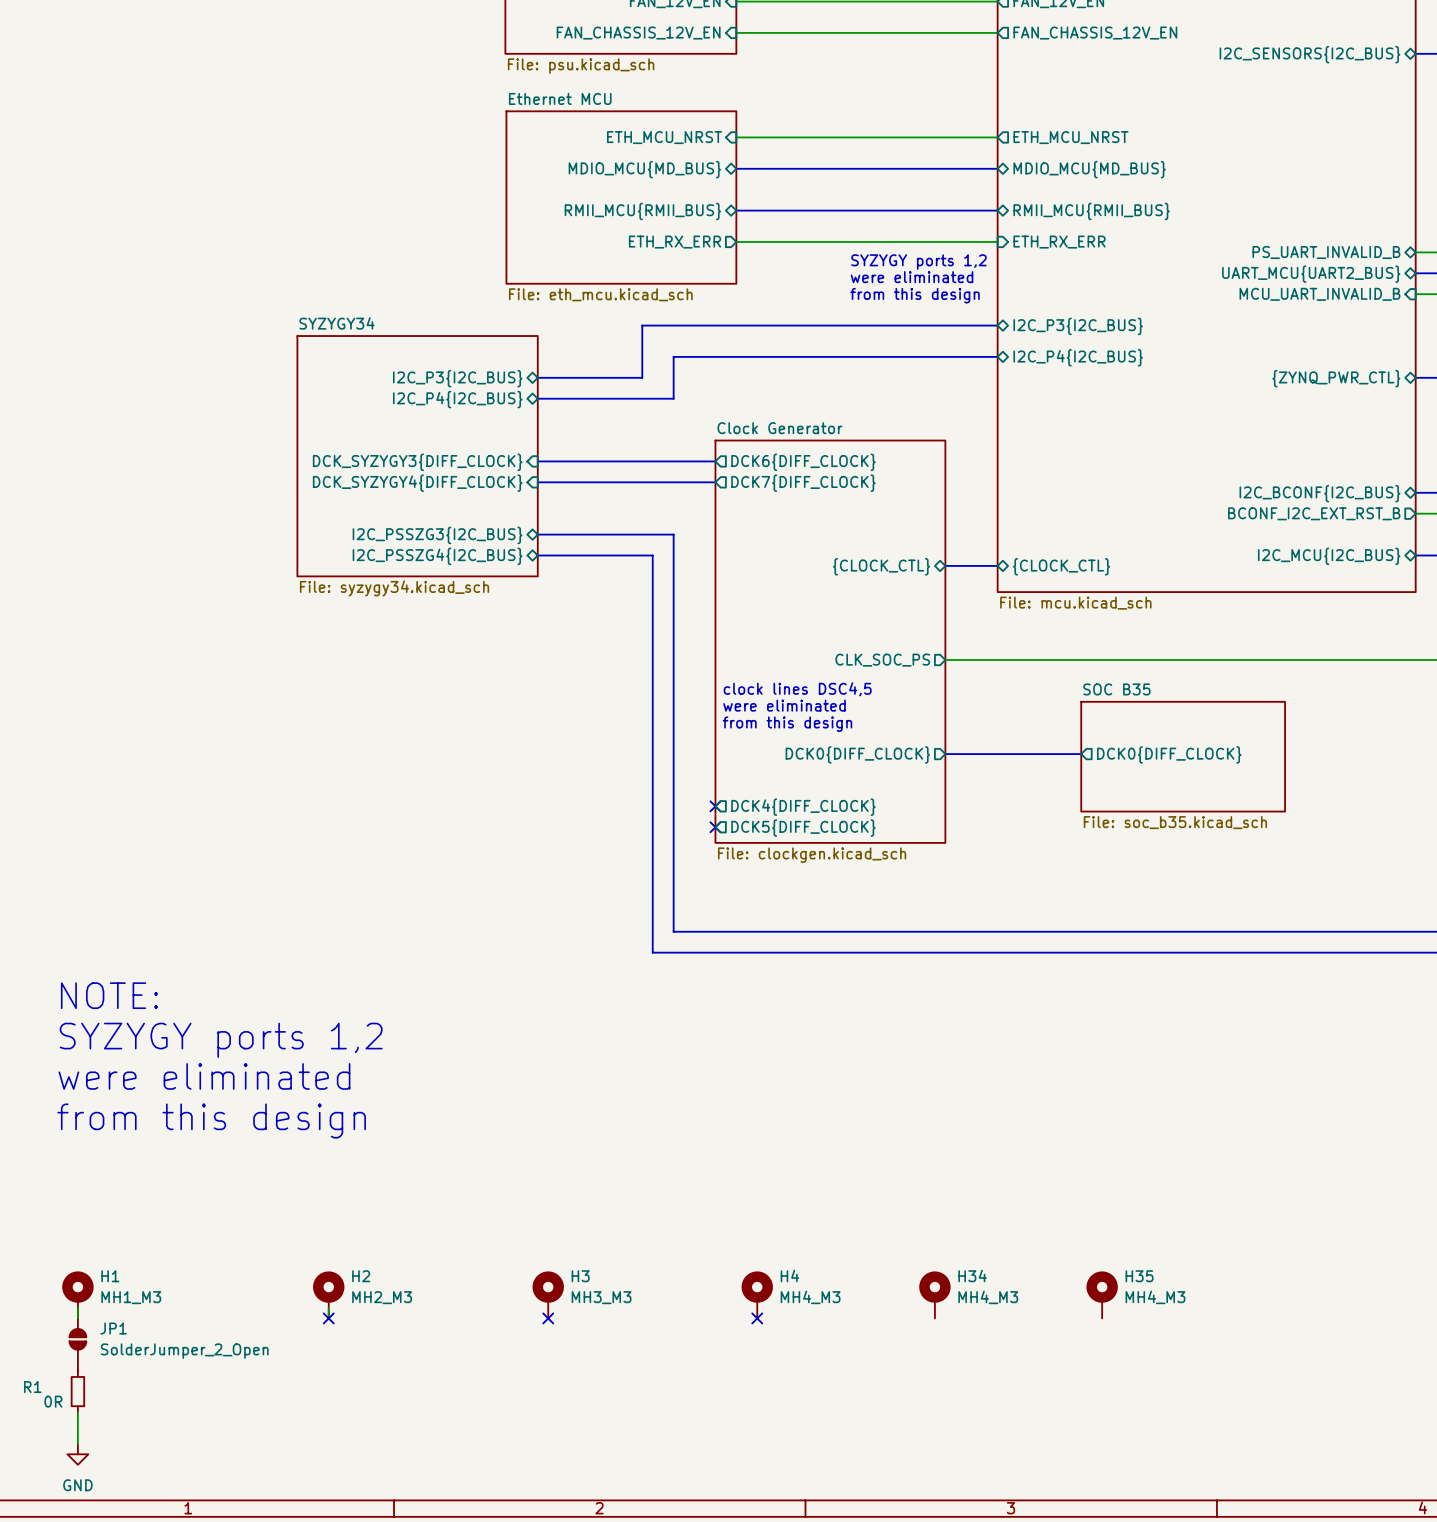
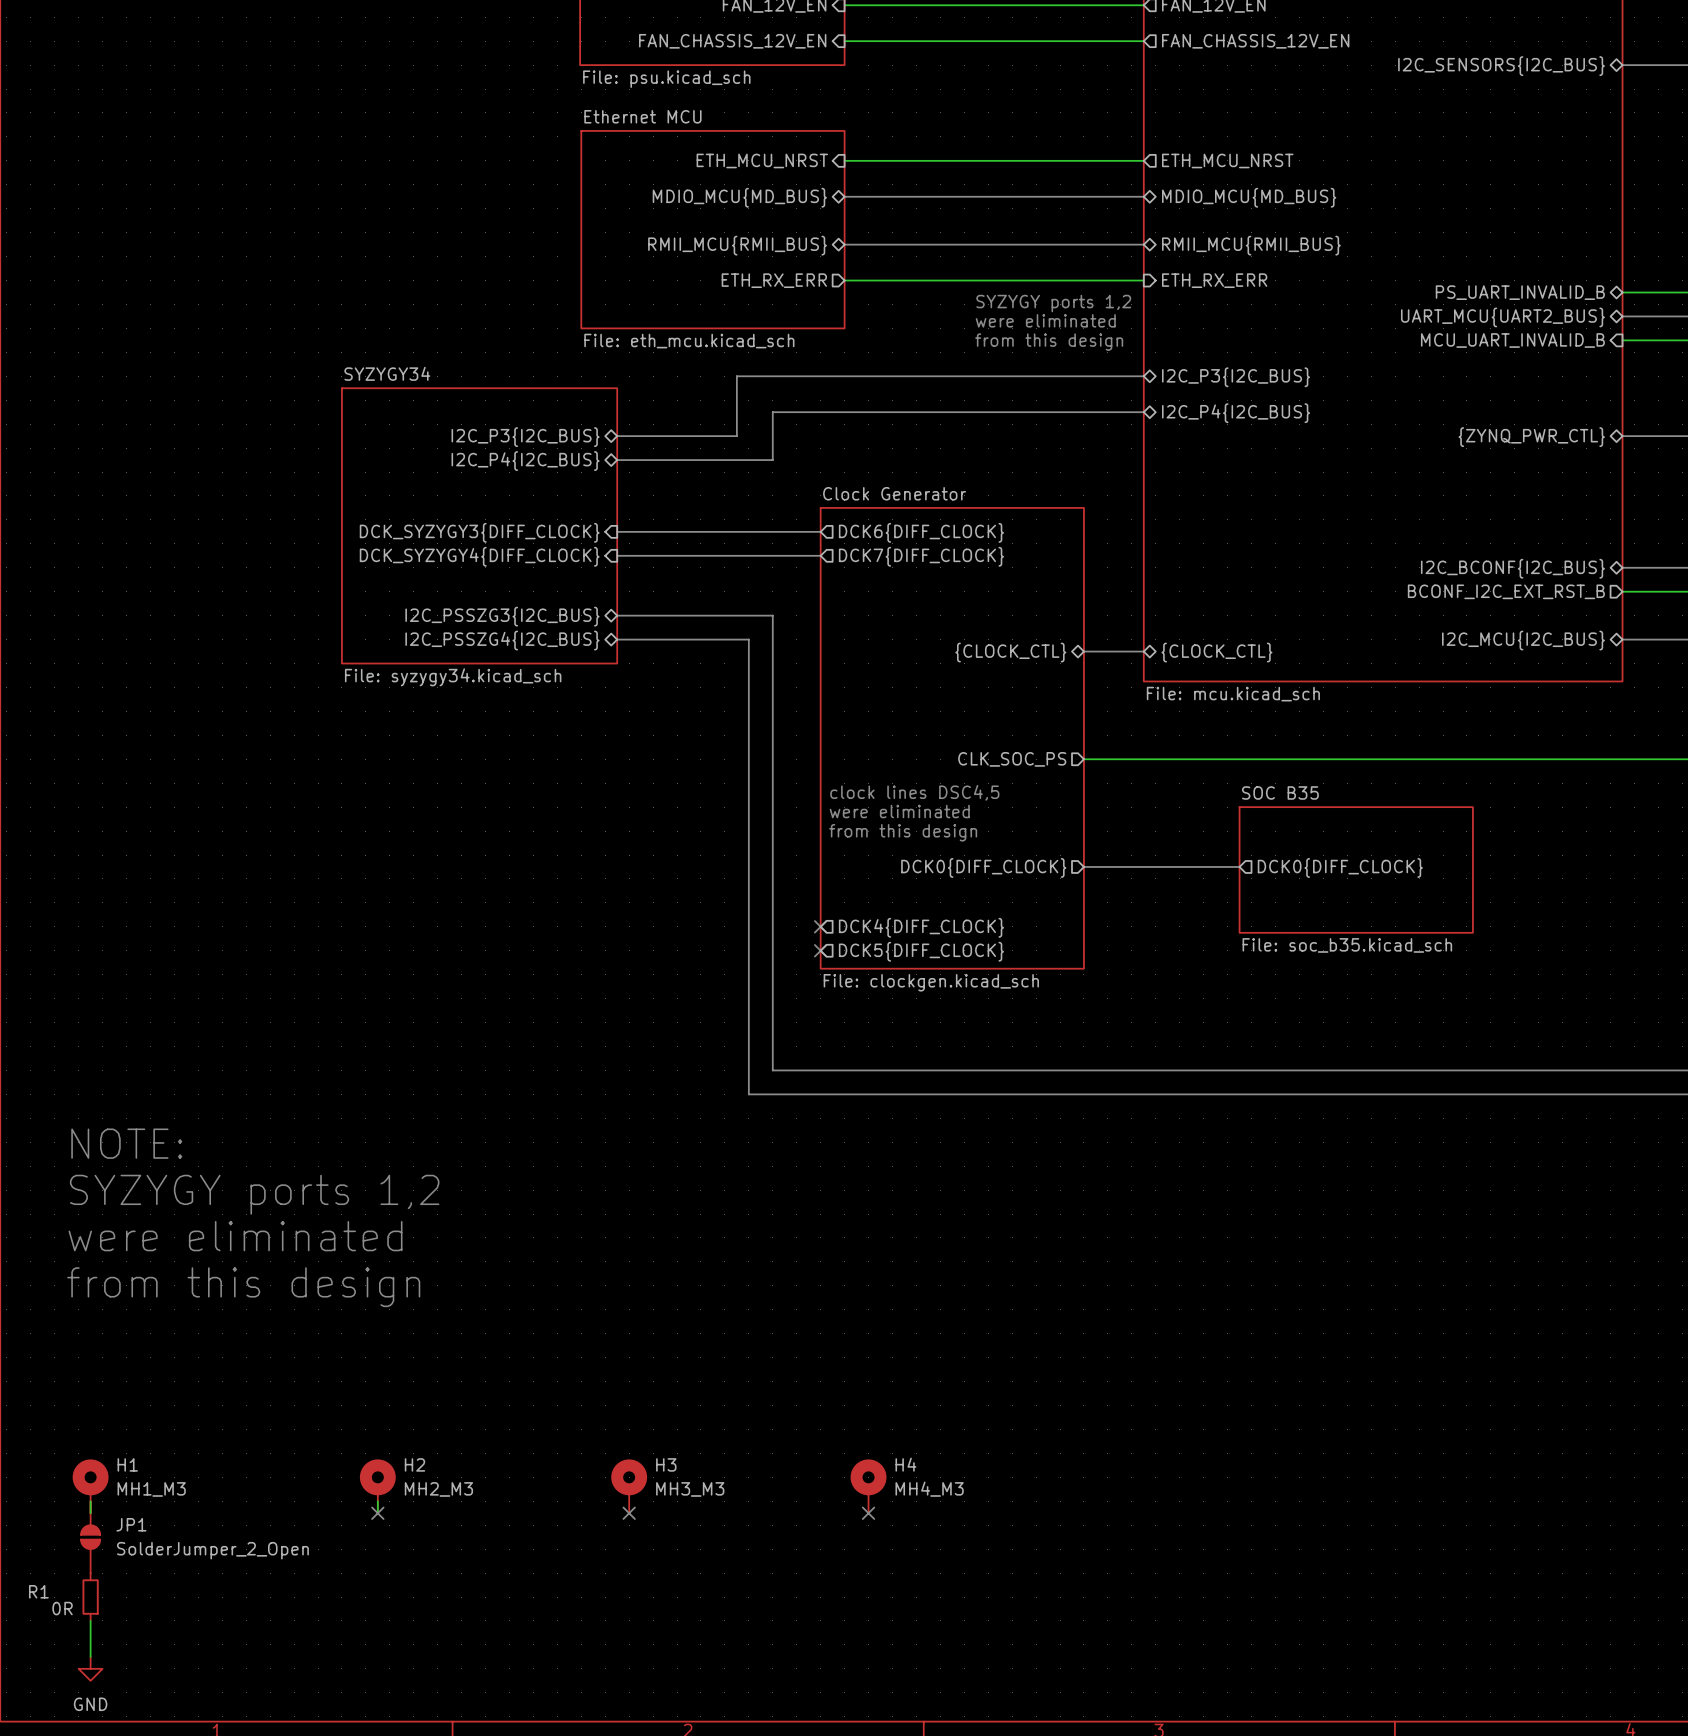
H34: MH4_M3 (934, 1294) -> none
H35: MH4_M3 (1102, 1294) -> none

